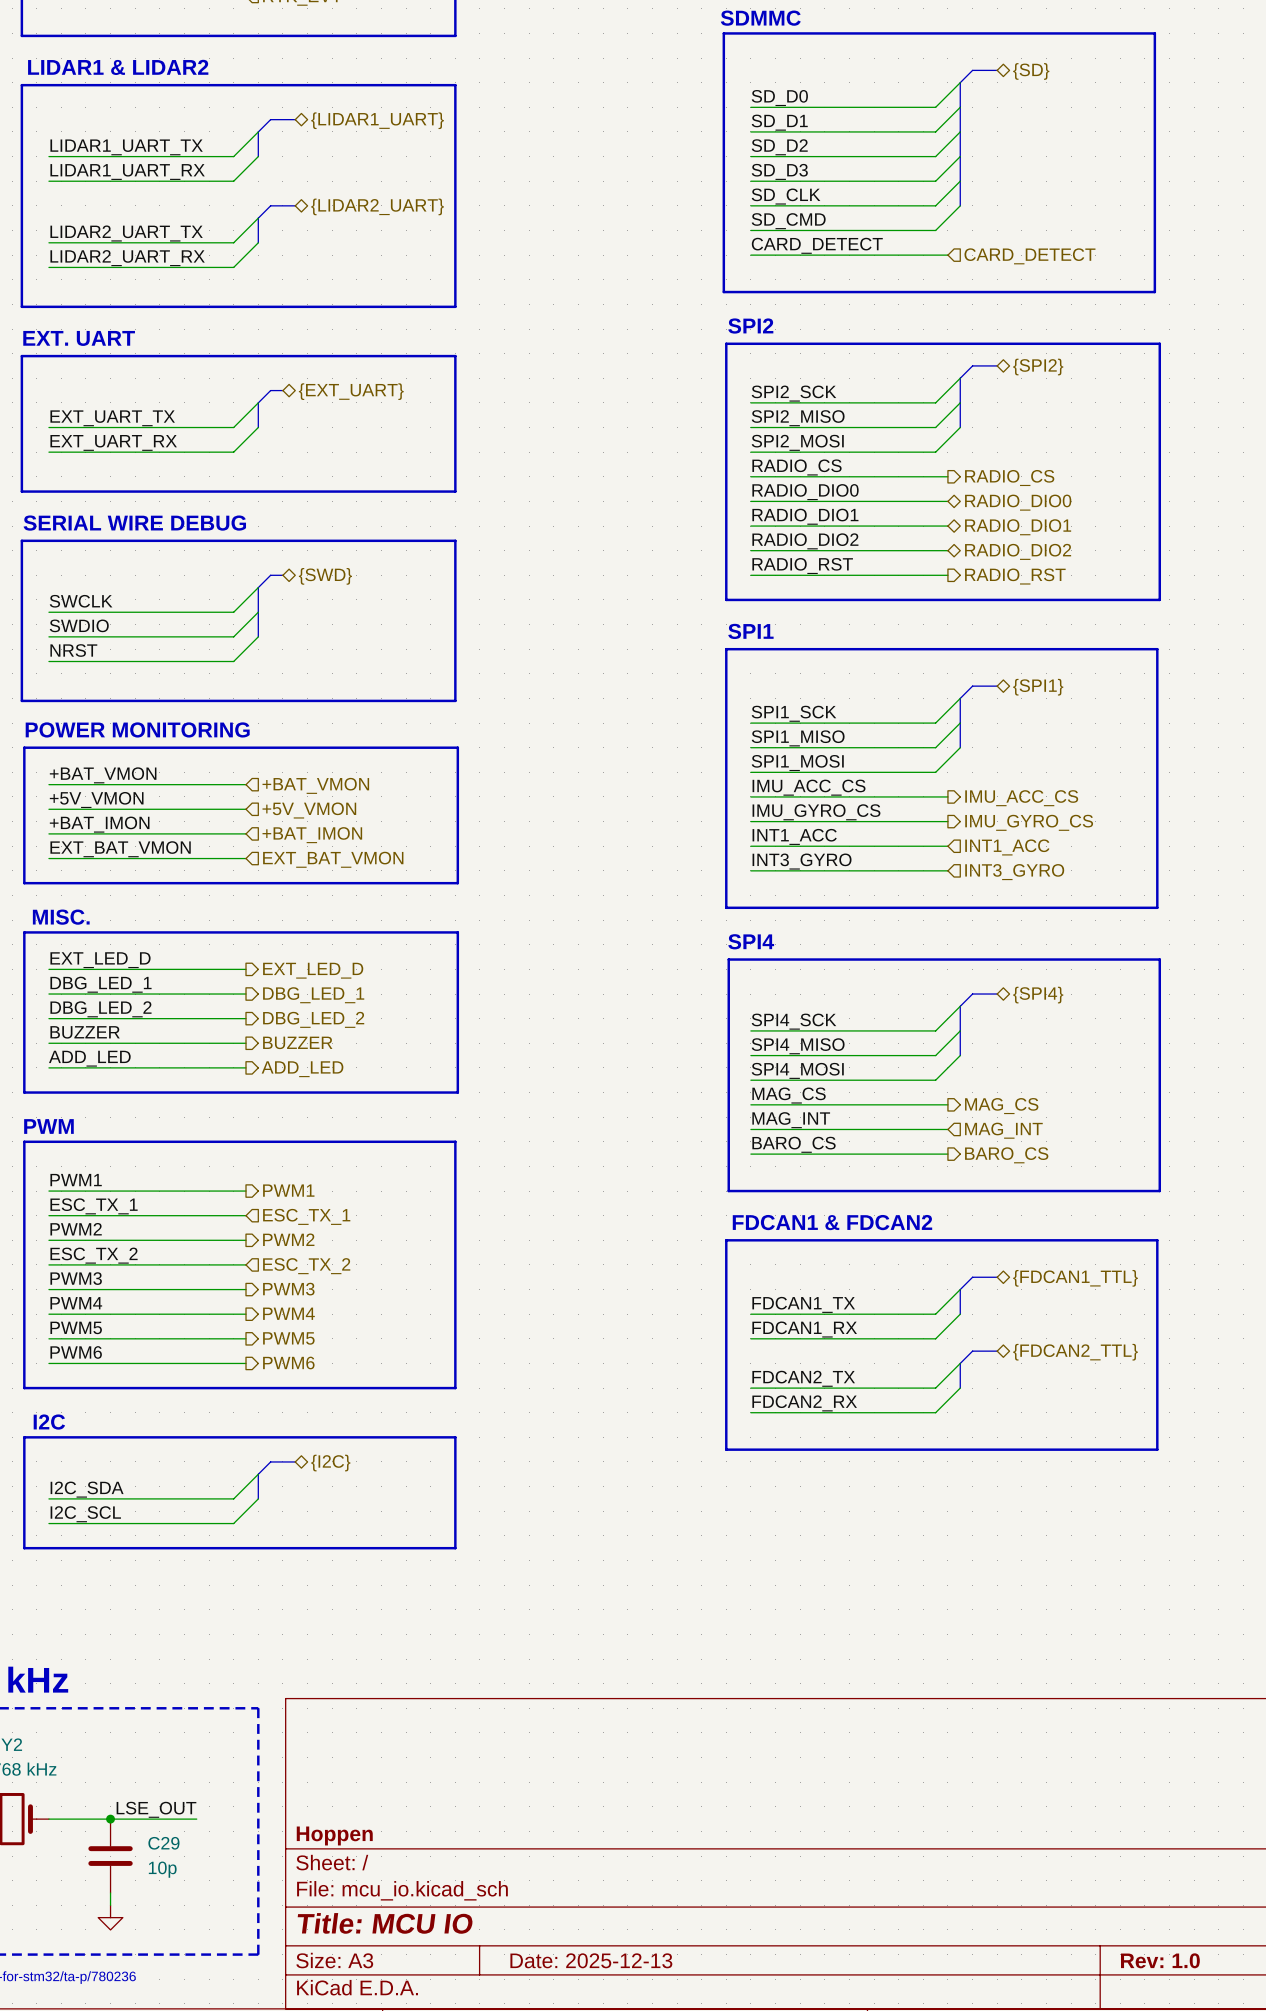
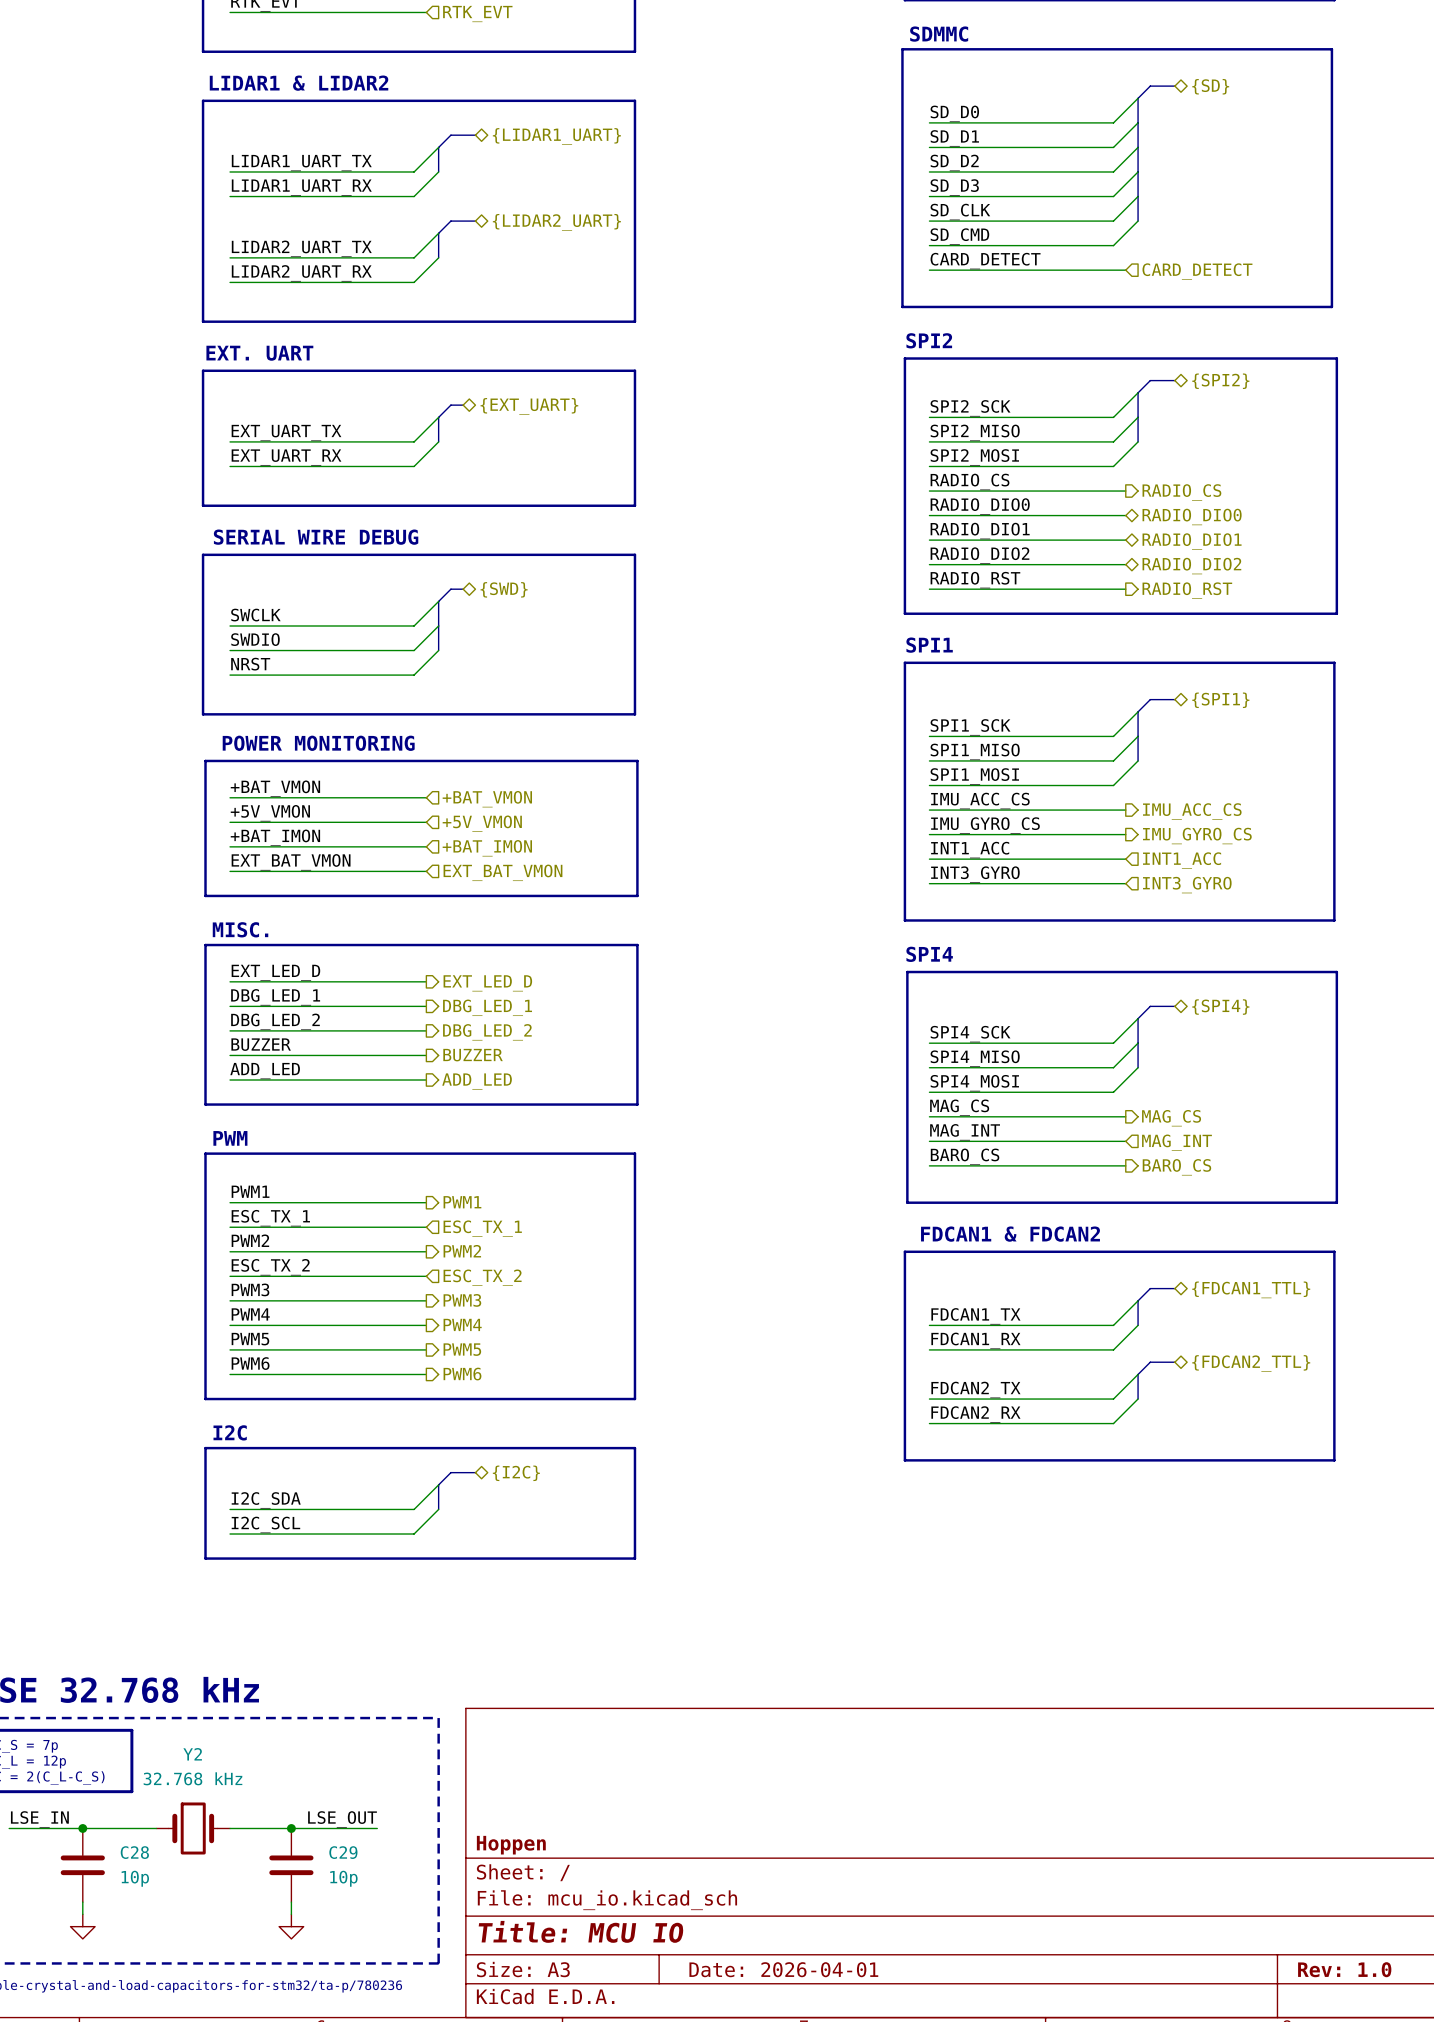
title block: Date: 2025-12-13 (591, 1960) -> Date: 2026-04-01 (783, 1969)

